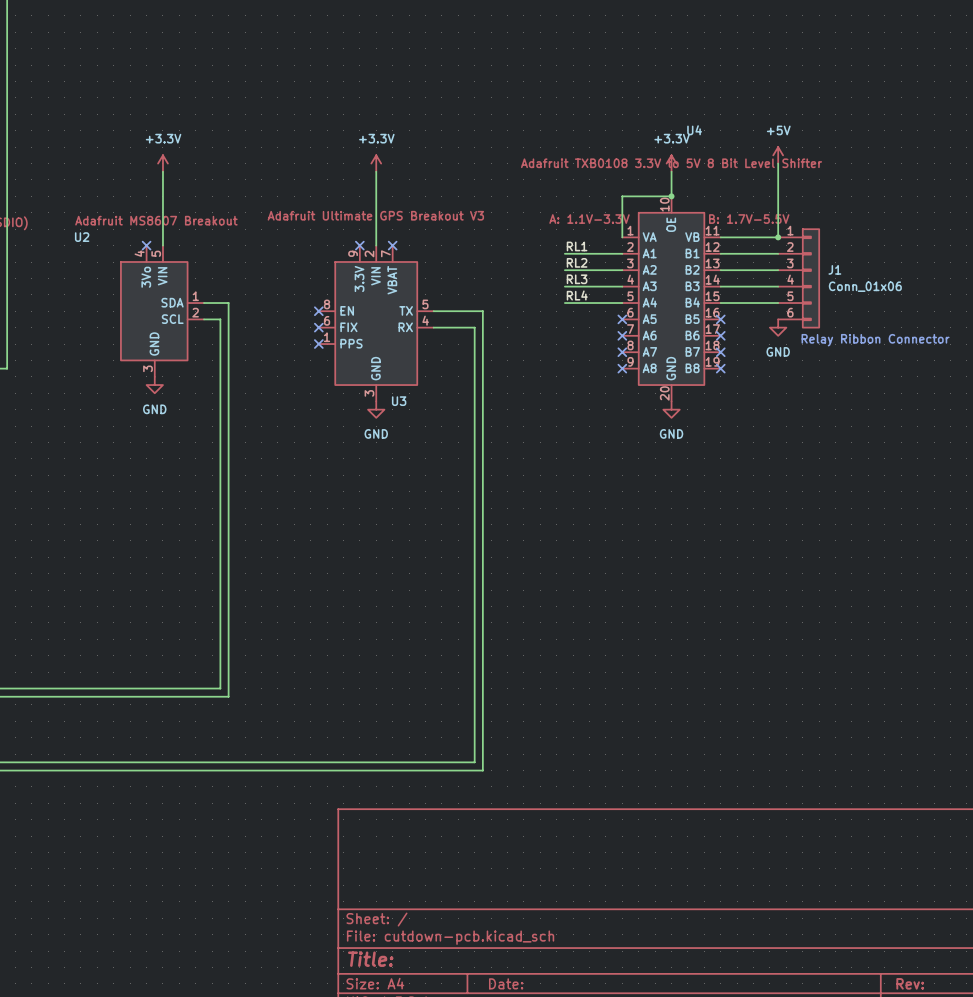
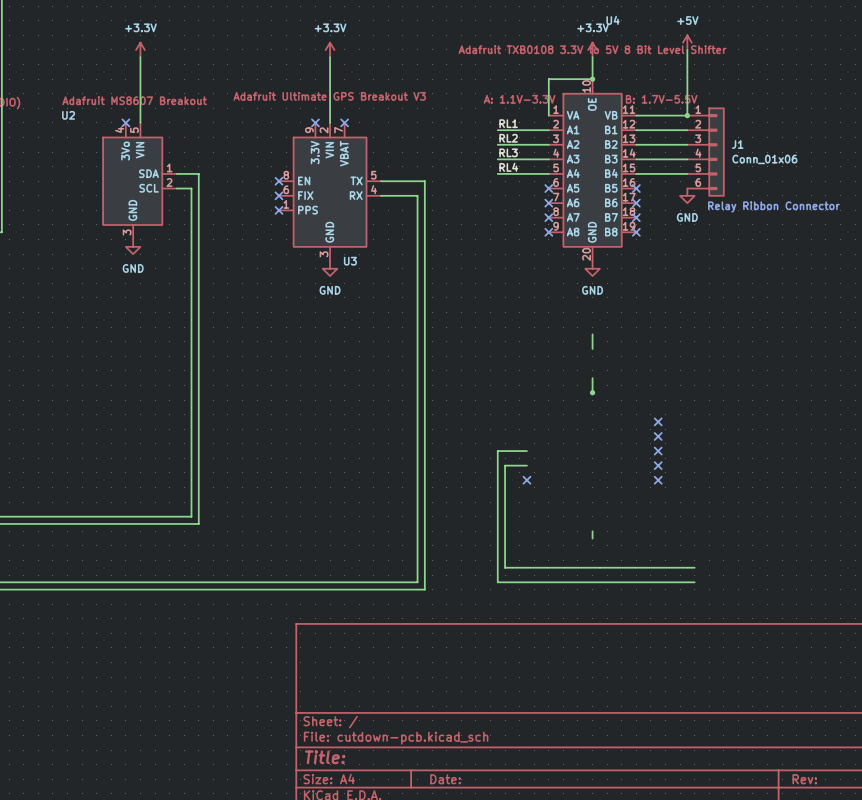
wire: none -> (592, 334) (592, 348)
wire: none -> (592, 378) (592, 392)
junction: none -> (592, 392)
no-connect mark: none -> (658, 421)
no-connect mark: none -> (658, 436)
wire: none -> (526, 451) (497, 451) (497, 582) (694, 582)
no-connect mark: none -> (658, 451)
wire: none -> (526, 465) (505, 465) (505, 567) (694, 567)
no-connect mark: none -> (658, 465)
no-connect mark: none -> (526, 480)
no-connect mark: none -> (658, 480)
wire: none -> (592, 531) (592, 538)

